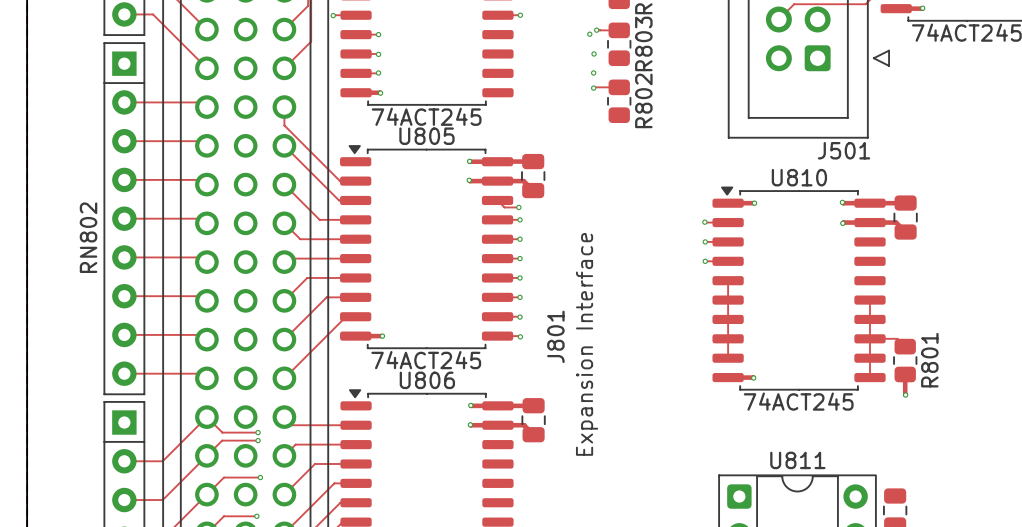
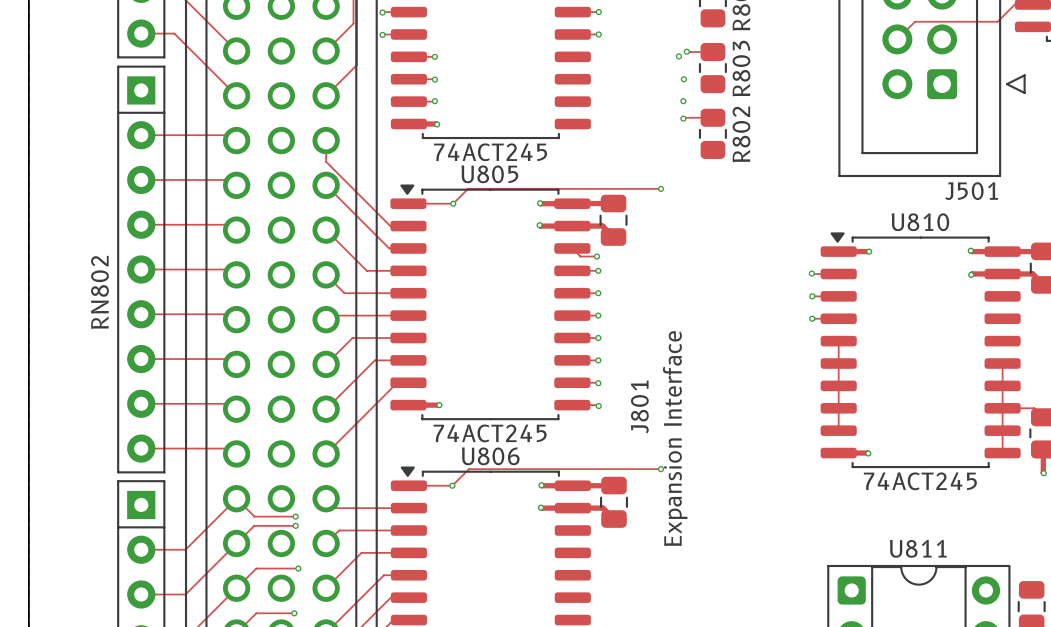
track: none -> (661, 188) (468, 188) (453, 203) (408, 203)
via: none -> (661, 188)
via: none -> (453, 203)
track: none -> (661, 469) (468, 469) (452, 485) (408, 485)
via: none -> (661, 469)
via: none -> (452, 485)

